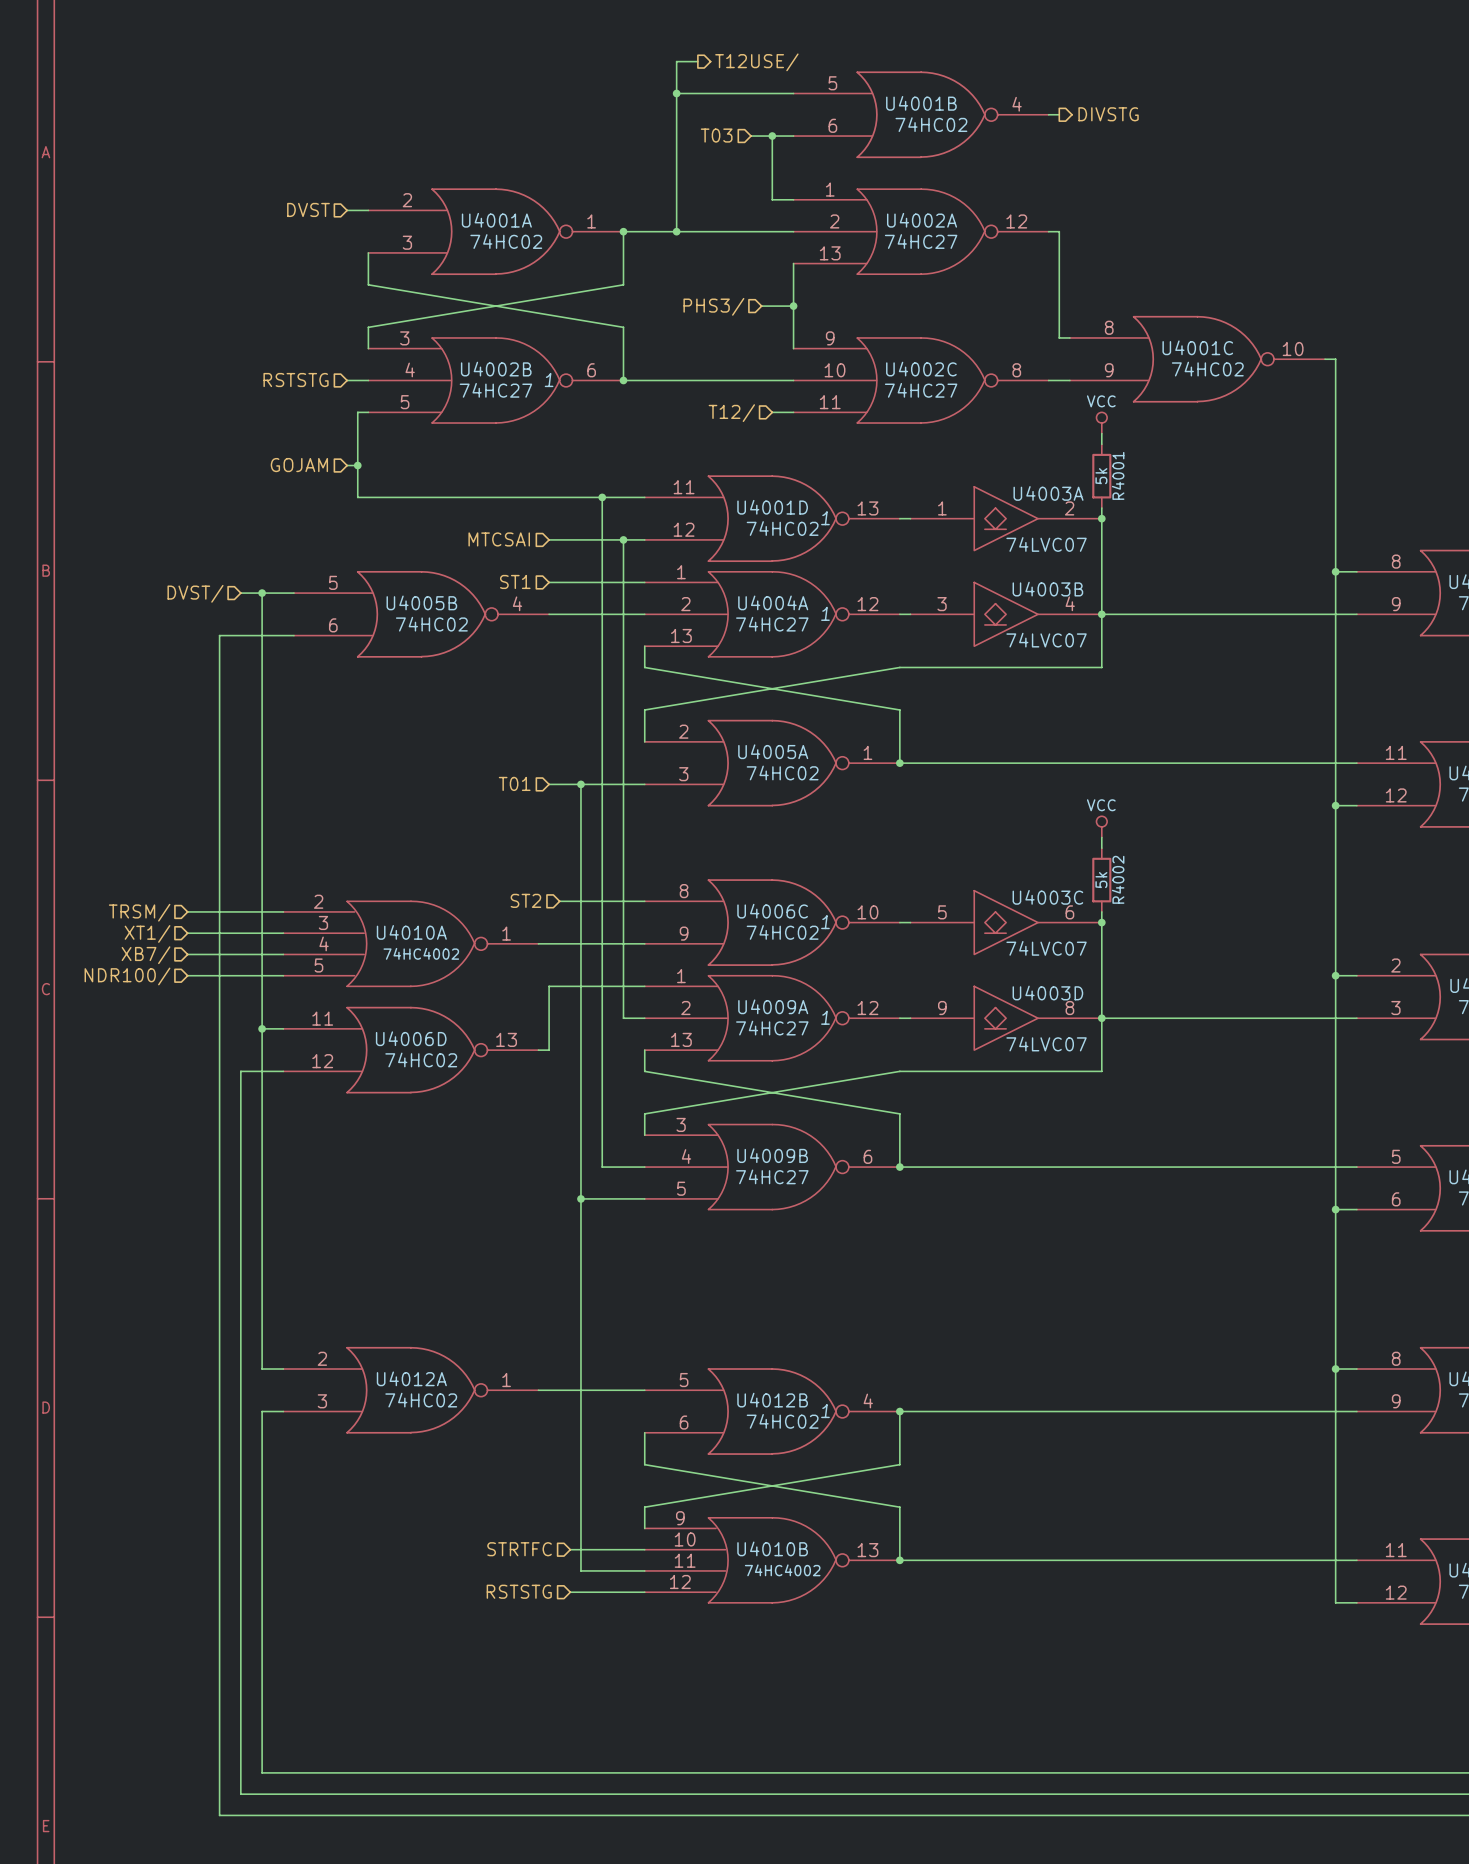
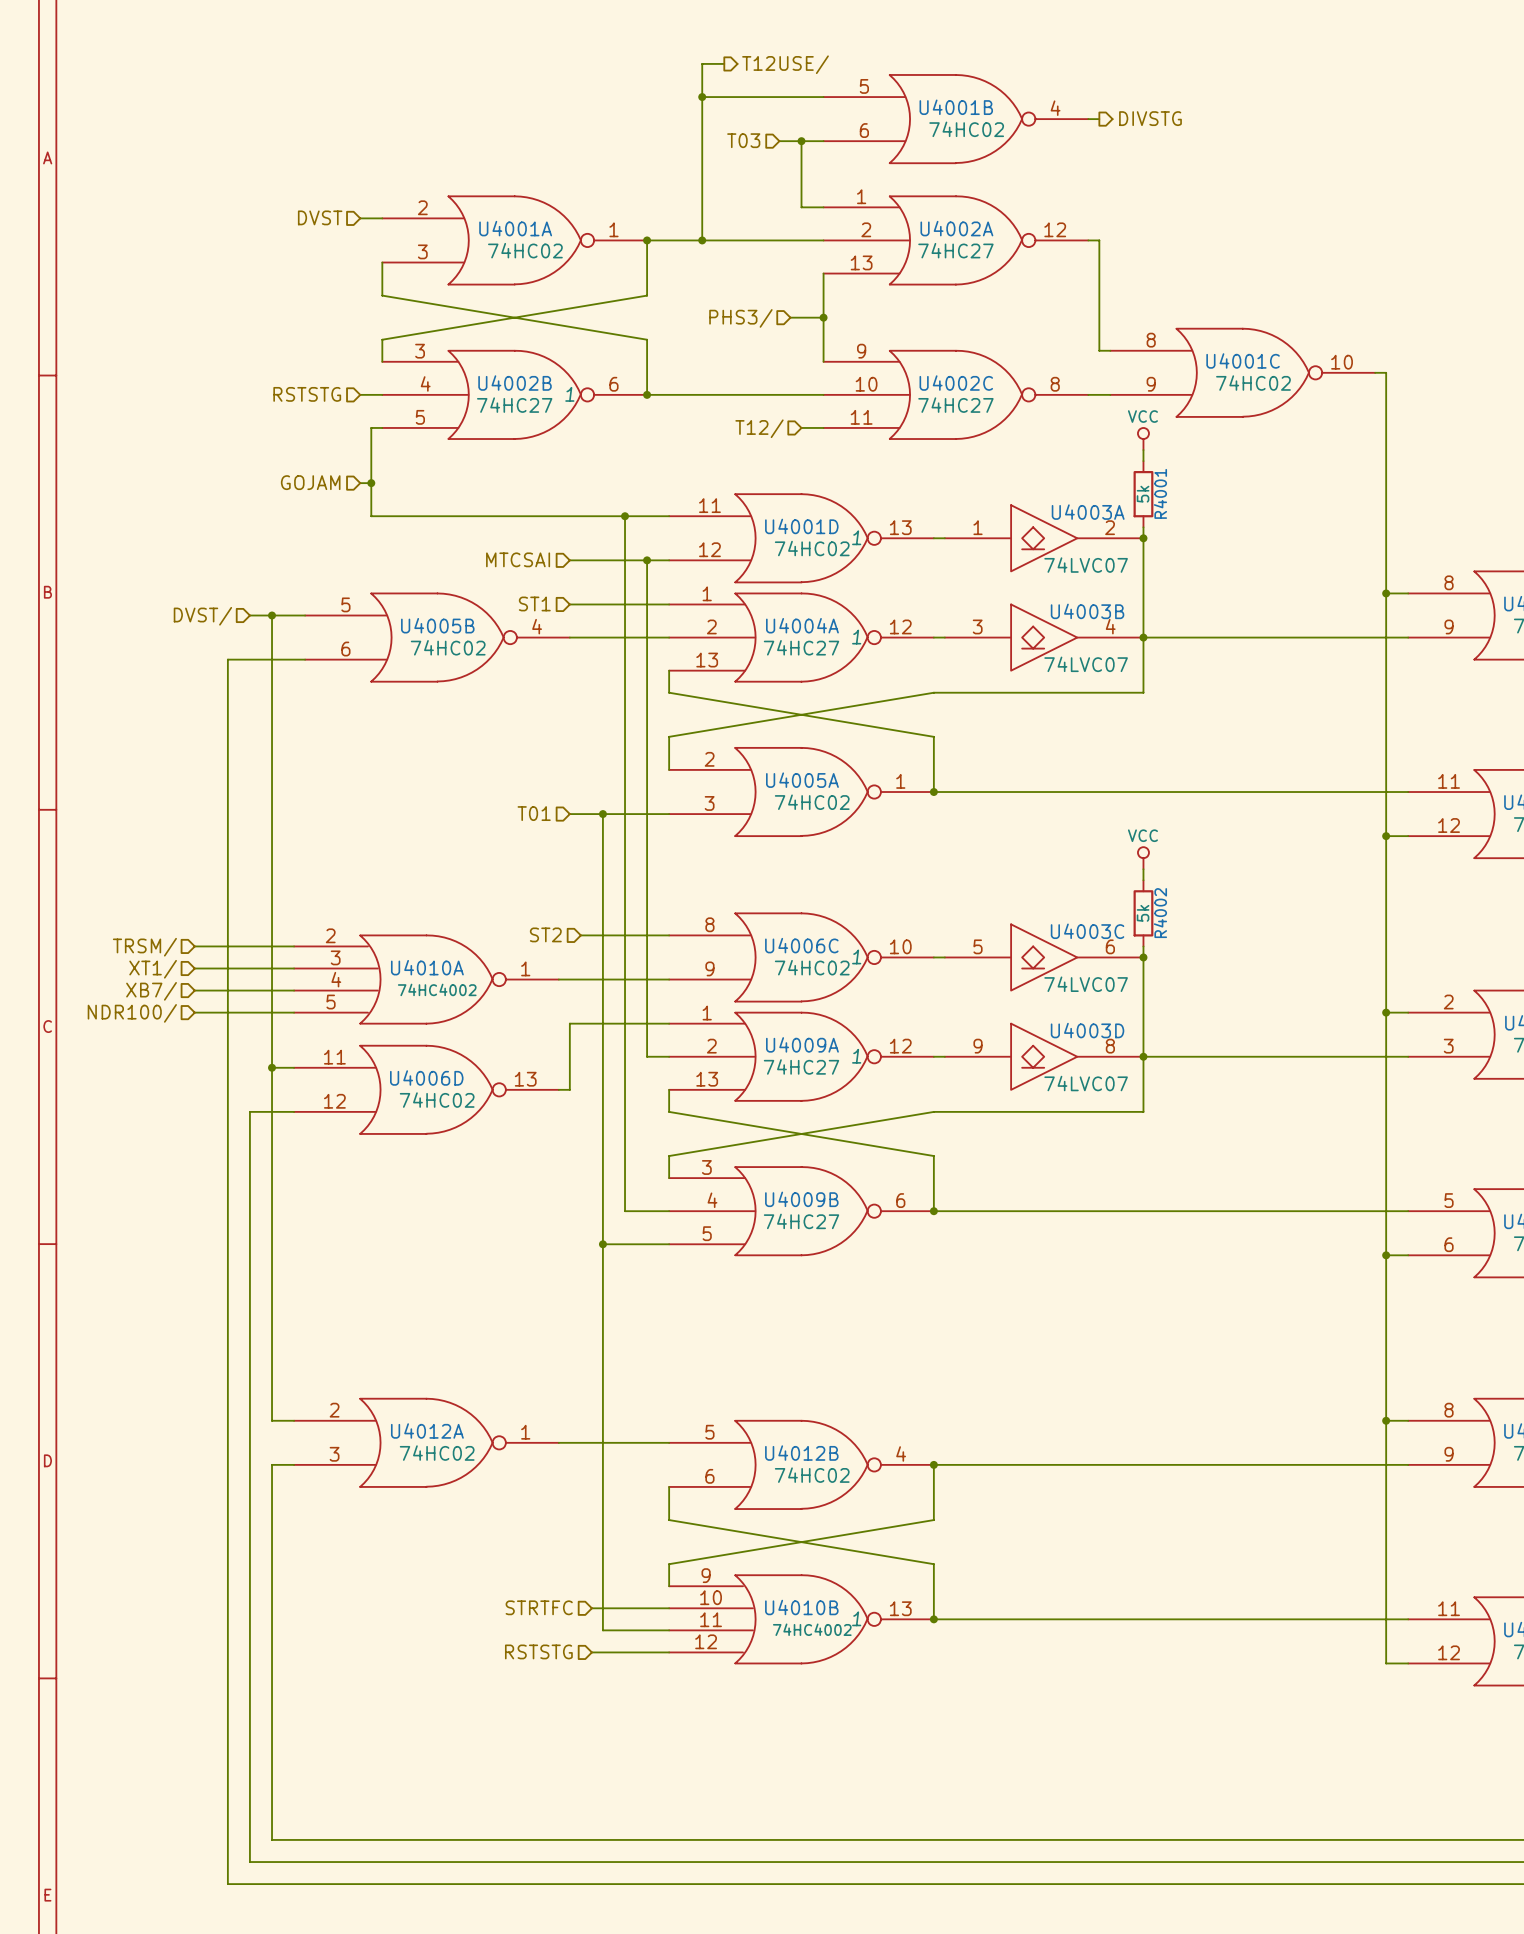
U4012B text: 1 (825, 1411) -> none
U4010B text: none -> 1 (856, 1618)

